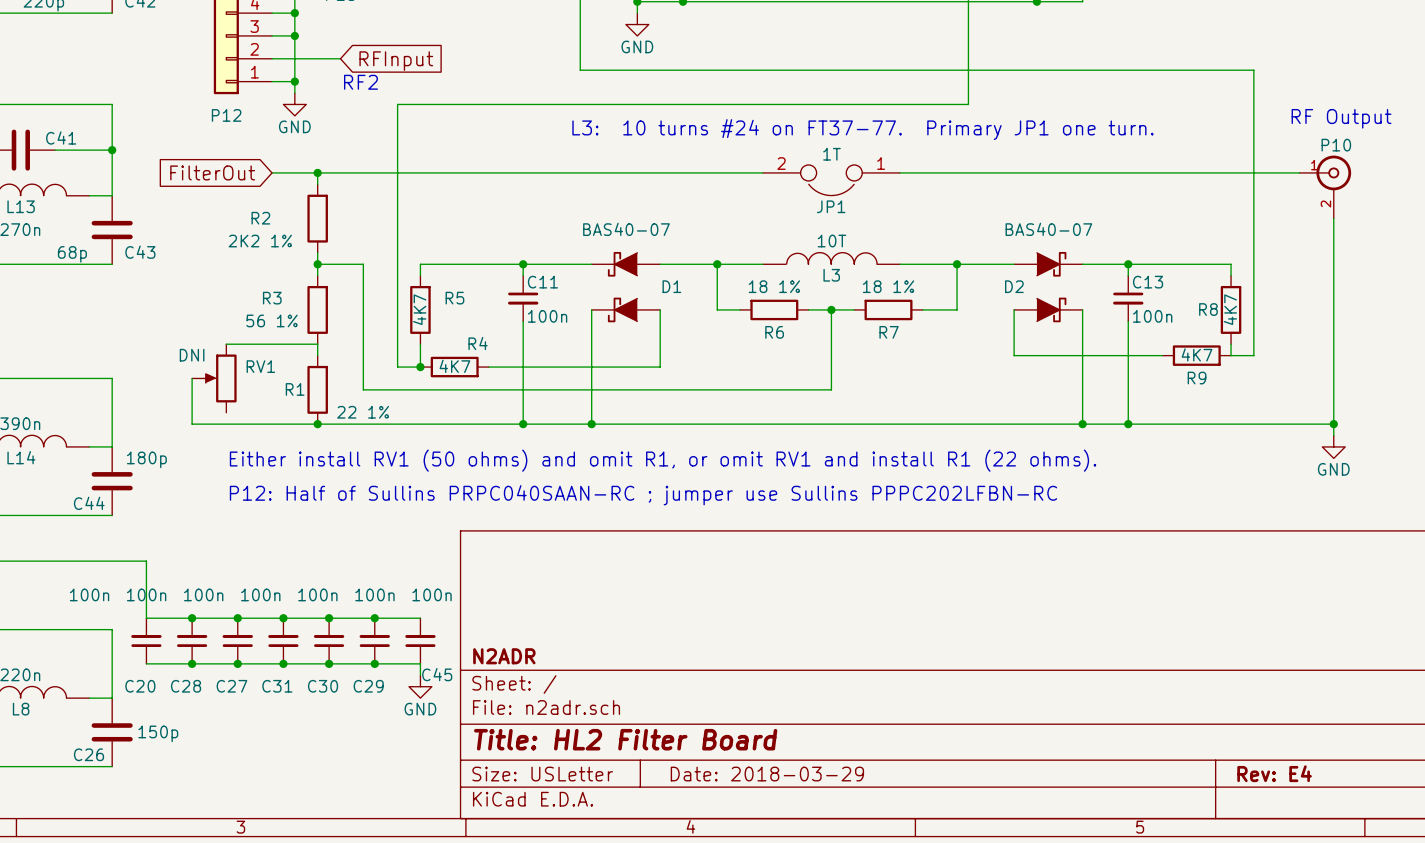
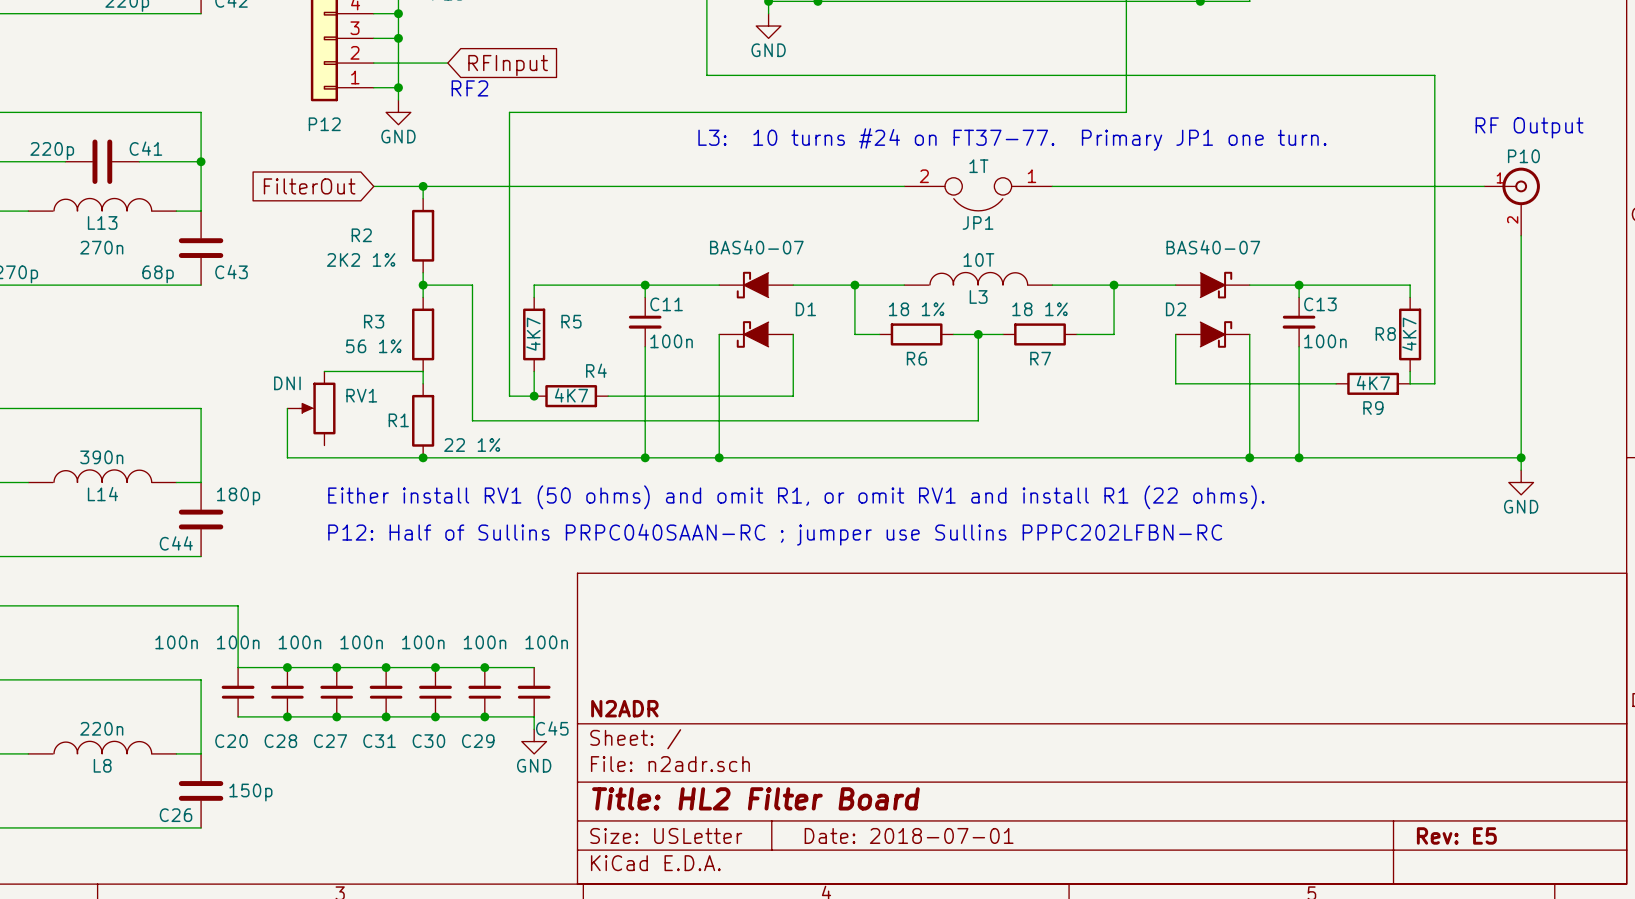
title block: Rev: E4 (1274, 773) -> Rev: E5 (1456, 835)
title block: Date: 2018-03-29 (767, 774) -> Date: 2018-07-01 (909, 835)

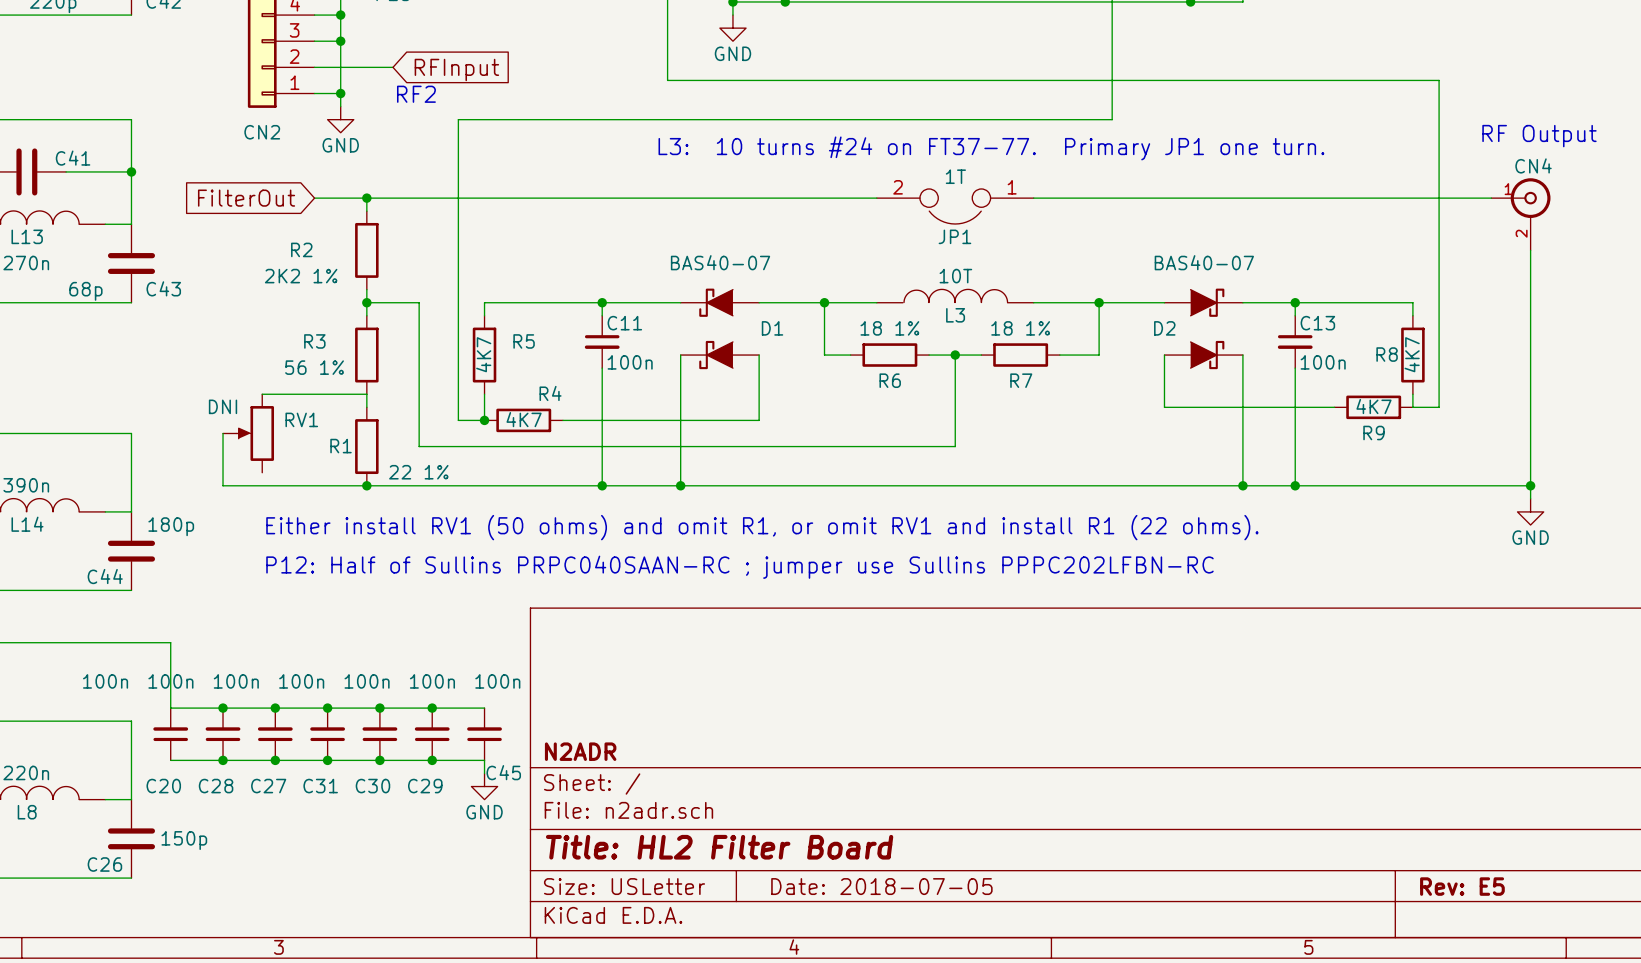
P12 name: P12 (324, 124) -> CN2 (262, 132)
P10 name: P10 (1523, 156) -> CN4 (1533, 165)
title block: Date: 2018-07-01 (909, 835) -> Date: 2018-07-05 (881, 886)

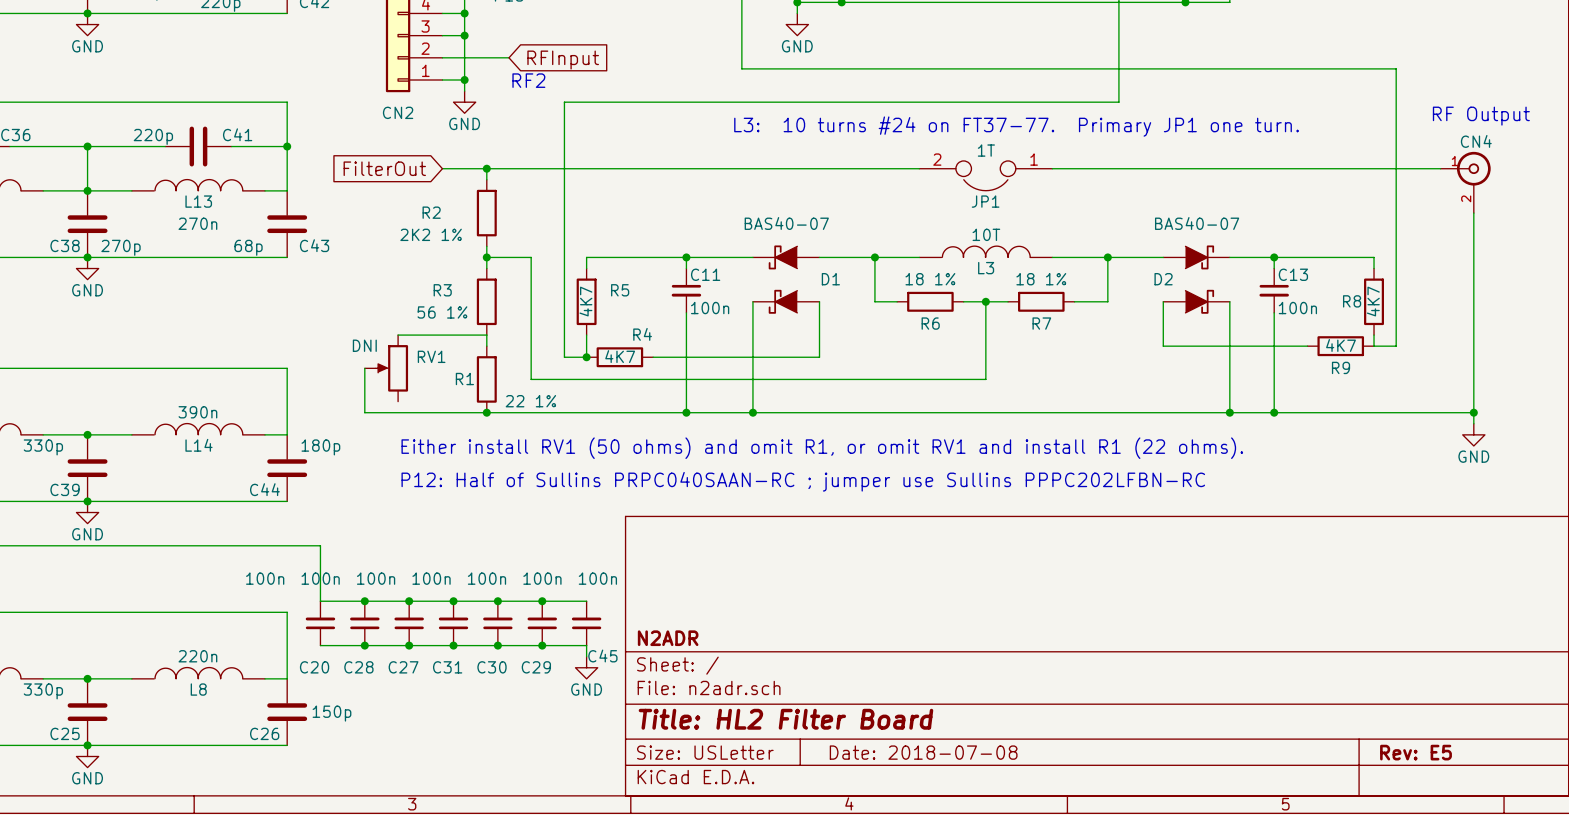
title block: Date: 2018-07-05 (881, 886) -> Date: 2018-07-08 (923, 752)

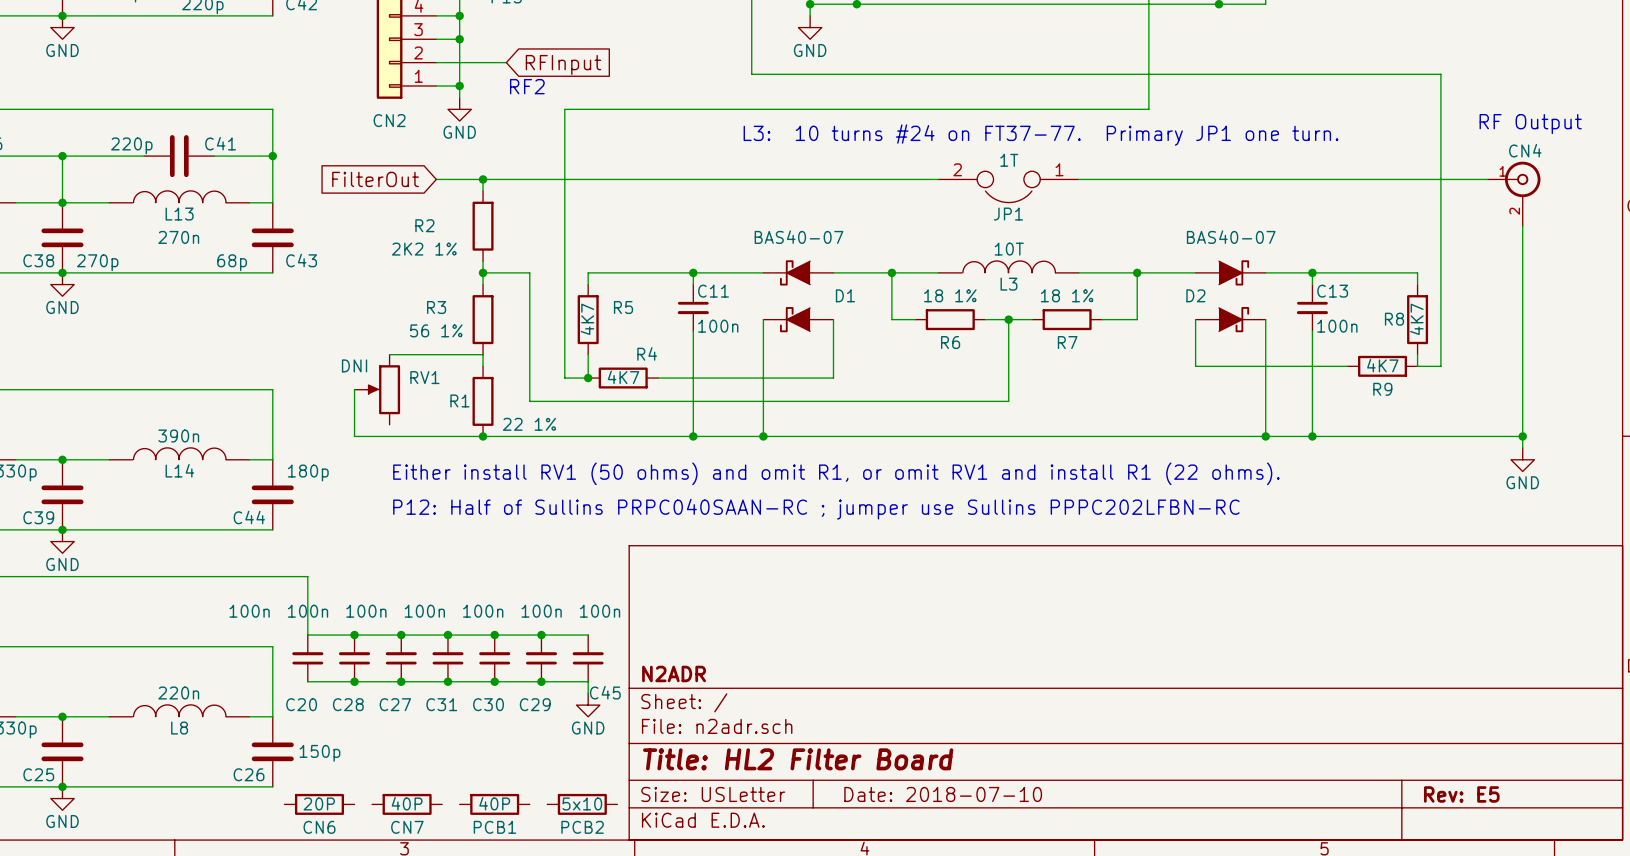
title block: Date: 2018-07-08 (923, 752) -> Date: 2018-07-10 (943, 794)
CN6: none -> 20P (319, 804)
CN7: none -> 40P (407, 804)
PCB1: none -> 40P (494, 804)
PCB2: none -> 5x10 (582, 804)

